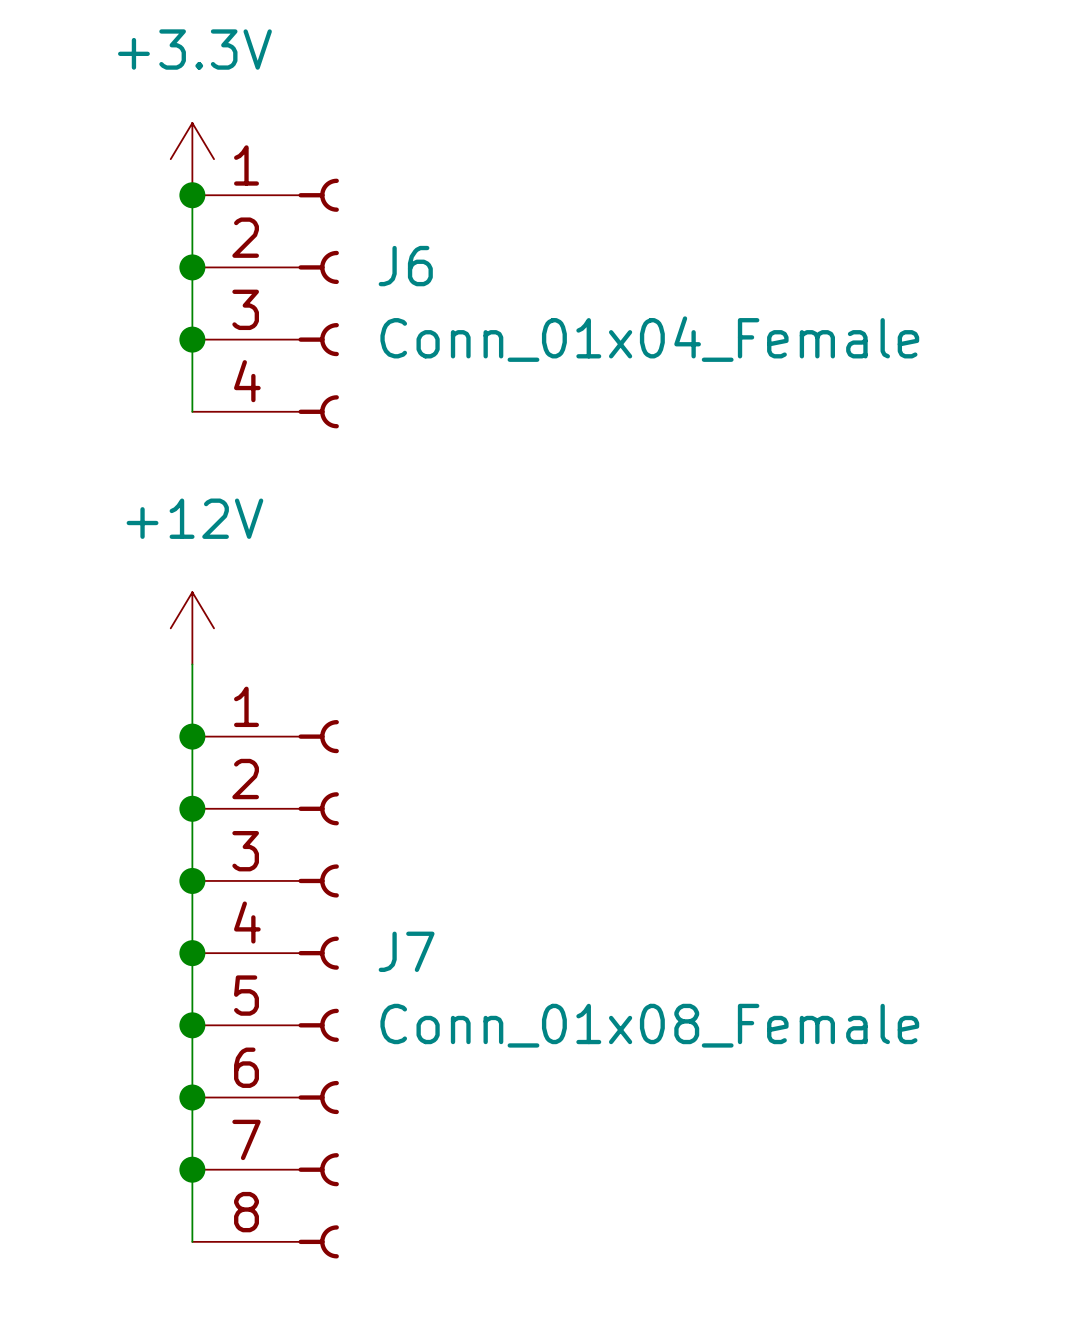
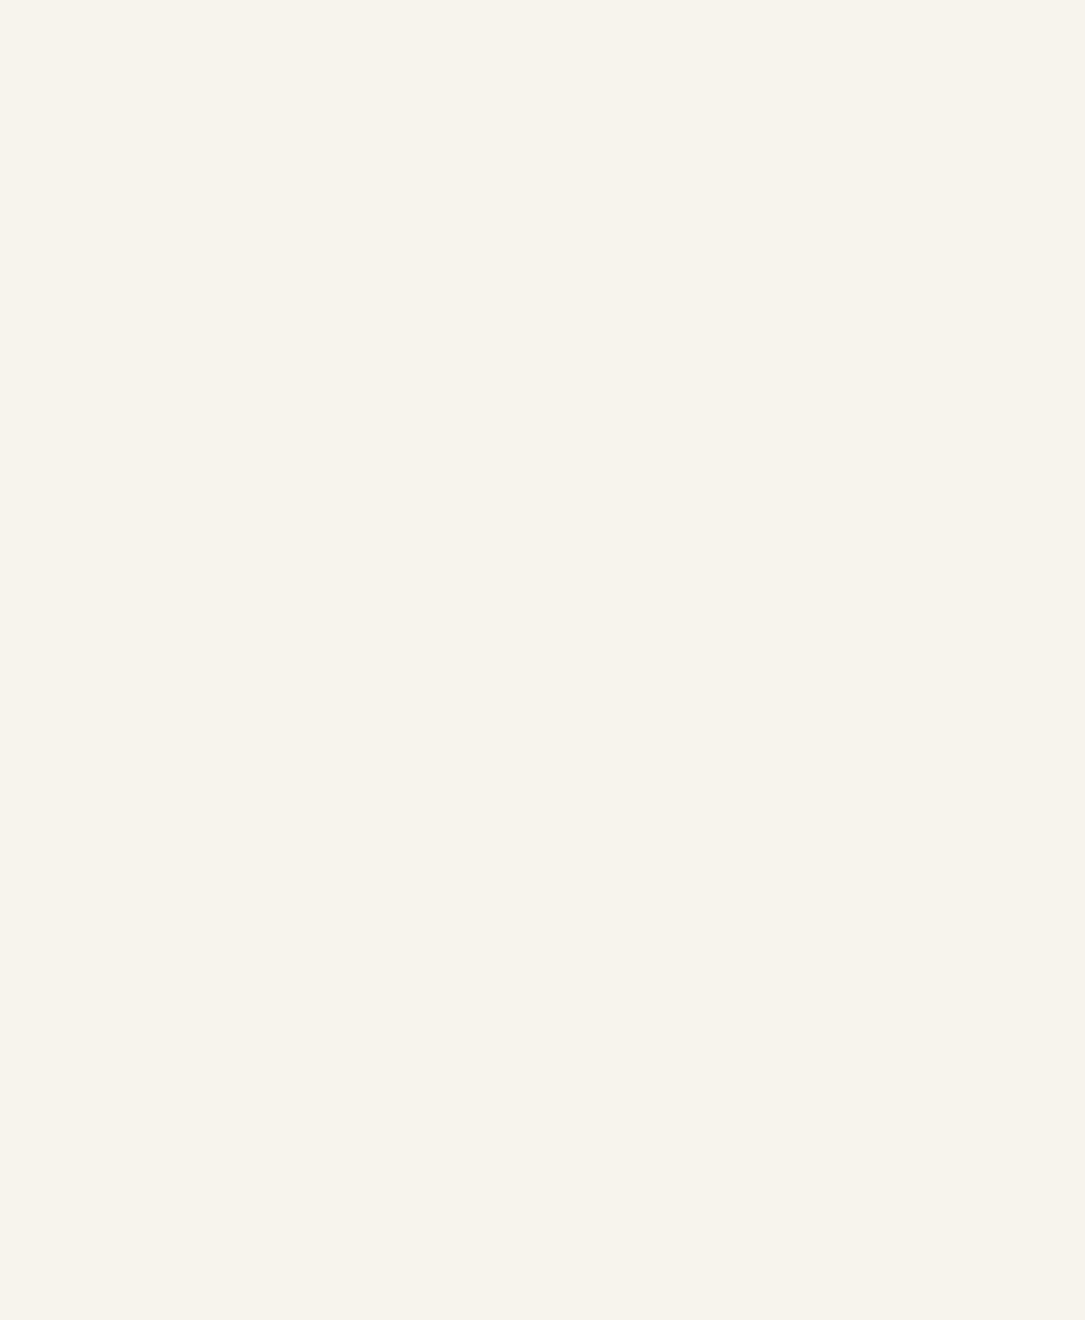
power symbol: +3.3V (192, 159) -> none
wire: (192, 195) (192, 411) -> none
junction: (192, 195) -> none
junction: (192, 267) -> none
J6: Conn_01x04_Female (265, 303) -> none
junction: (192, 339) -> none
power symbol: +12V (192, 628) -> none
wire: (192, 664) (192, 1241) -> none
junction: (192, 736) -> none
junction: (192, 808) -> none
junction: (192, 880) -> none
junction: (192, 953) -> none
J7: Conn_01x08_Female (265, 989) -> none
junction: (192, 1025) -> none
junction: (192, 1097) -> none
junction: (192, 1169) -> none

